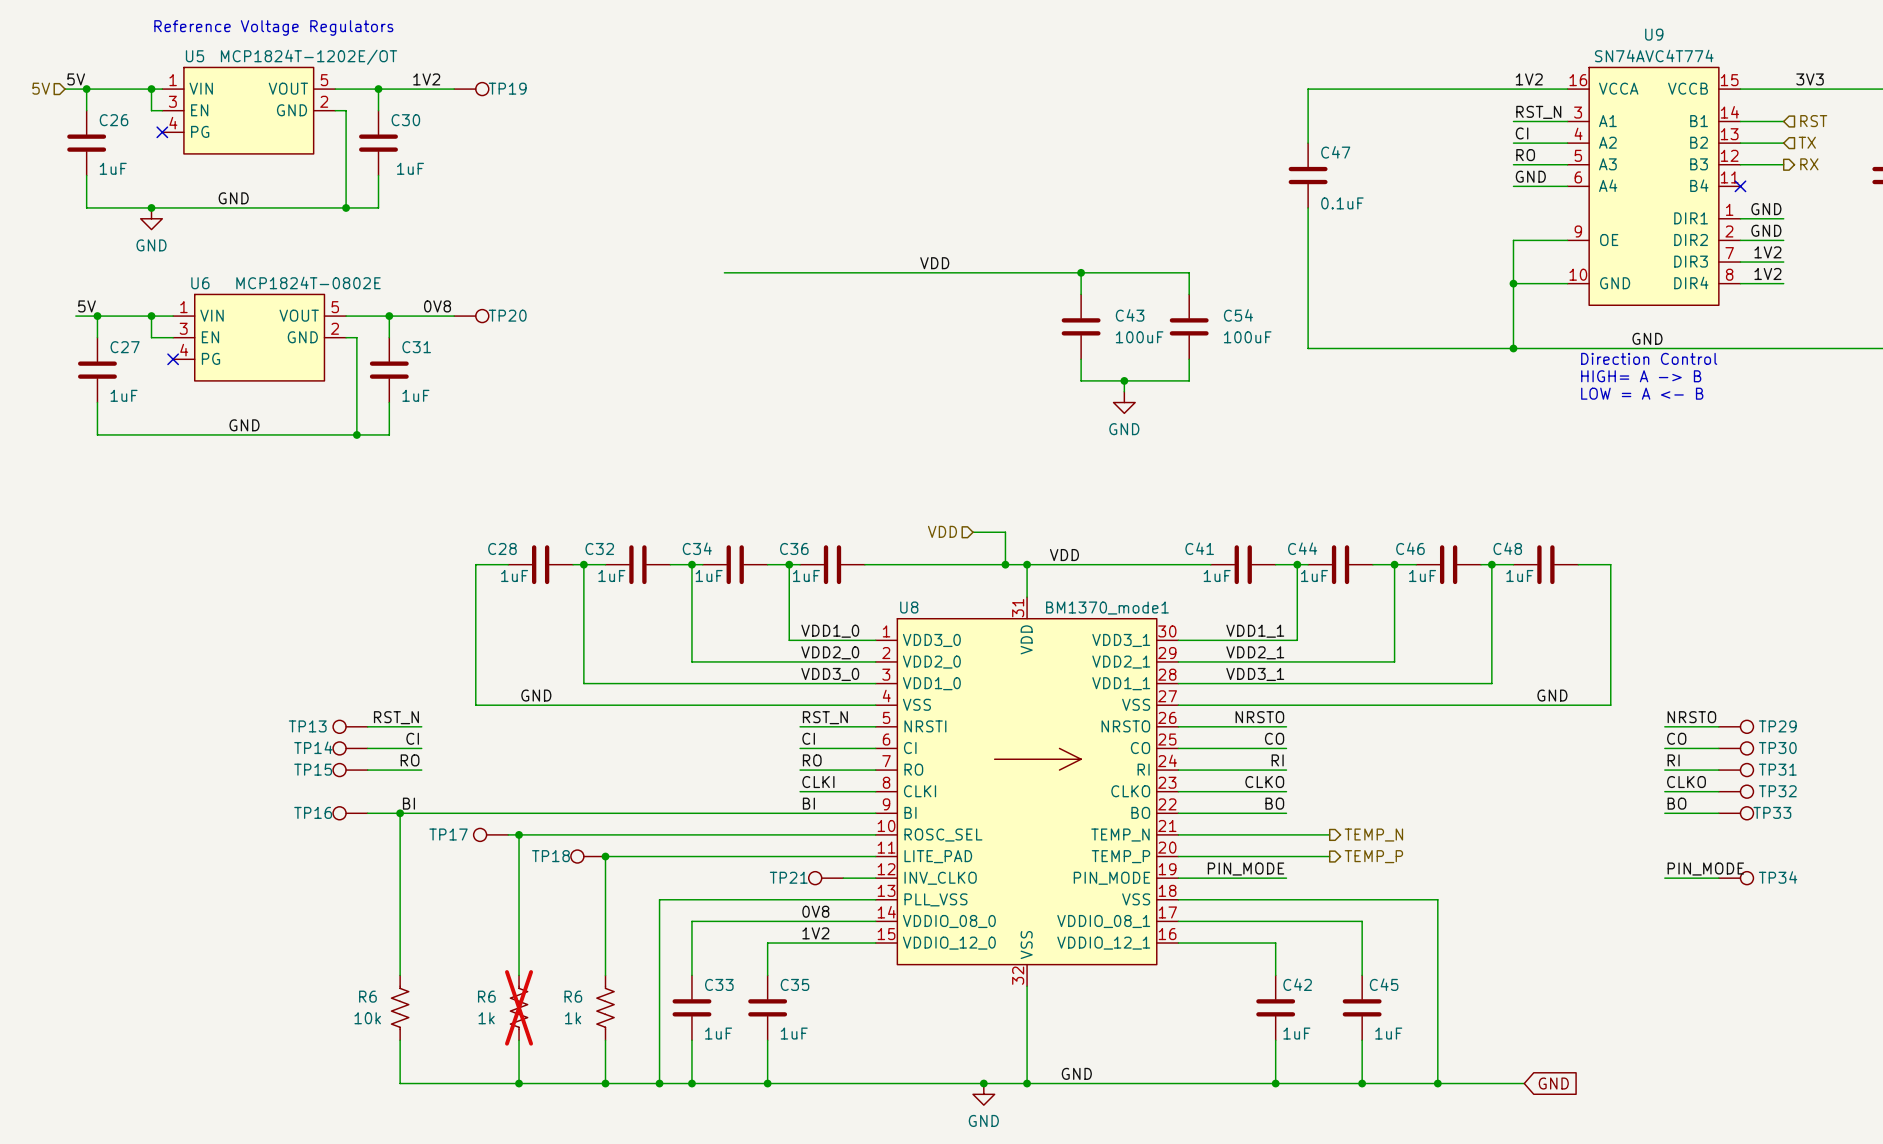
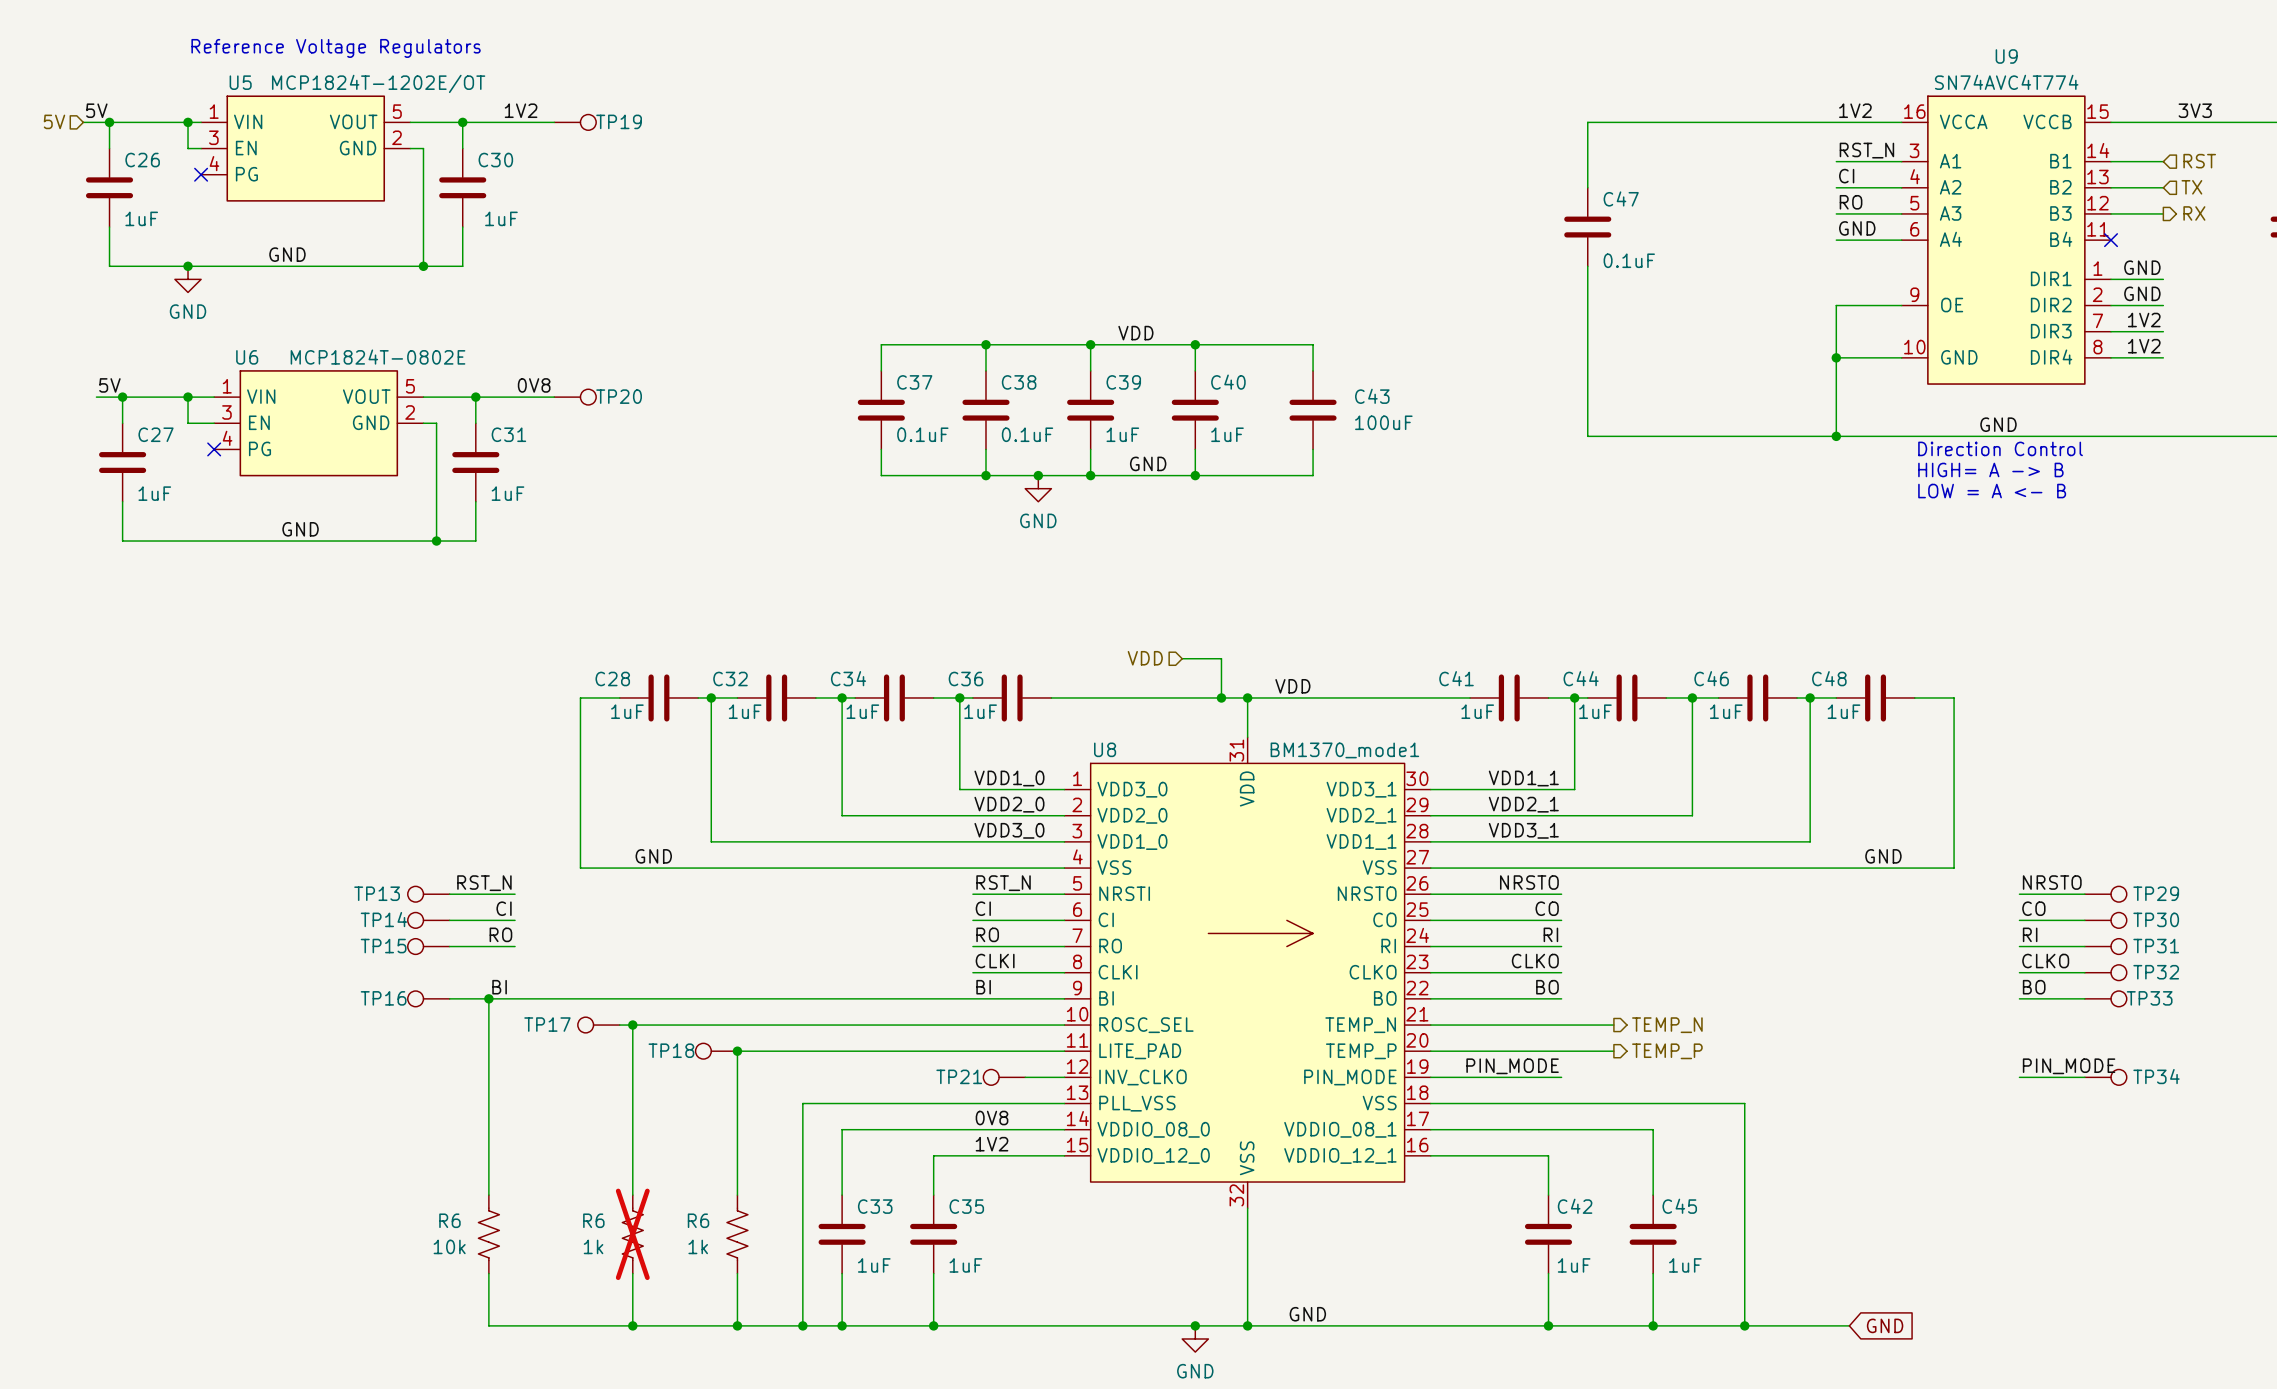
wire: none -> (881, 344) (881, 370)
wire: none -> (985, 344) (985, 370)
junction: none -> (985, 344)
wire: none -> (1090, 344) (1090, 370)
junction: none -> (1090, 344)
wire: none -> (1195, 344) (1195, 370)
junction: none -> (1195, 344)
wire: (1081, 272) (1189, 272) (1189, 294) -> none
junction: (1081, 272) -> none
C37: none -> 0.1uF (881, 410)
C38: none -> 0.1uF (985, 410)
C39: none -> 1uF (1090, 410)
C40: none -> 1uF (1195, 410)
C54: 100uF (1189, 326) -> none
wire: none -> (985, 449) (985, 475)
wire: none -> (1090, 449) (1090, 475)
wire: none -> (1195, 449) (1195, 475)
wire: (1189, 359) (1189, 380) (1081, 380) -> (881, 449) (881, 475) (1313, 475)
label: none -> GND (1148, 463)
junction: none -> (985, 475)
junction: none -> (1038, 475)
junction: none -> (1090, 475)
junction: none -> (1195, 475)
wire: (1124, 380) (1124, 391) -> none
junction: (1124, 380) -> none
power symbol: none -> GND (1038, 488)
power symbol: GND (1124, 402) -> none

